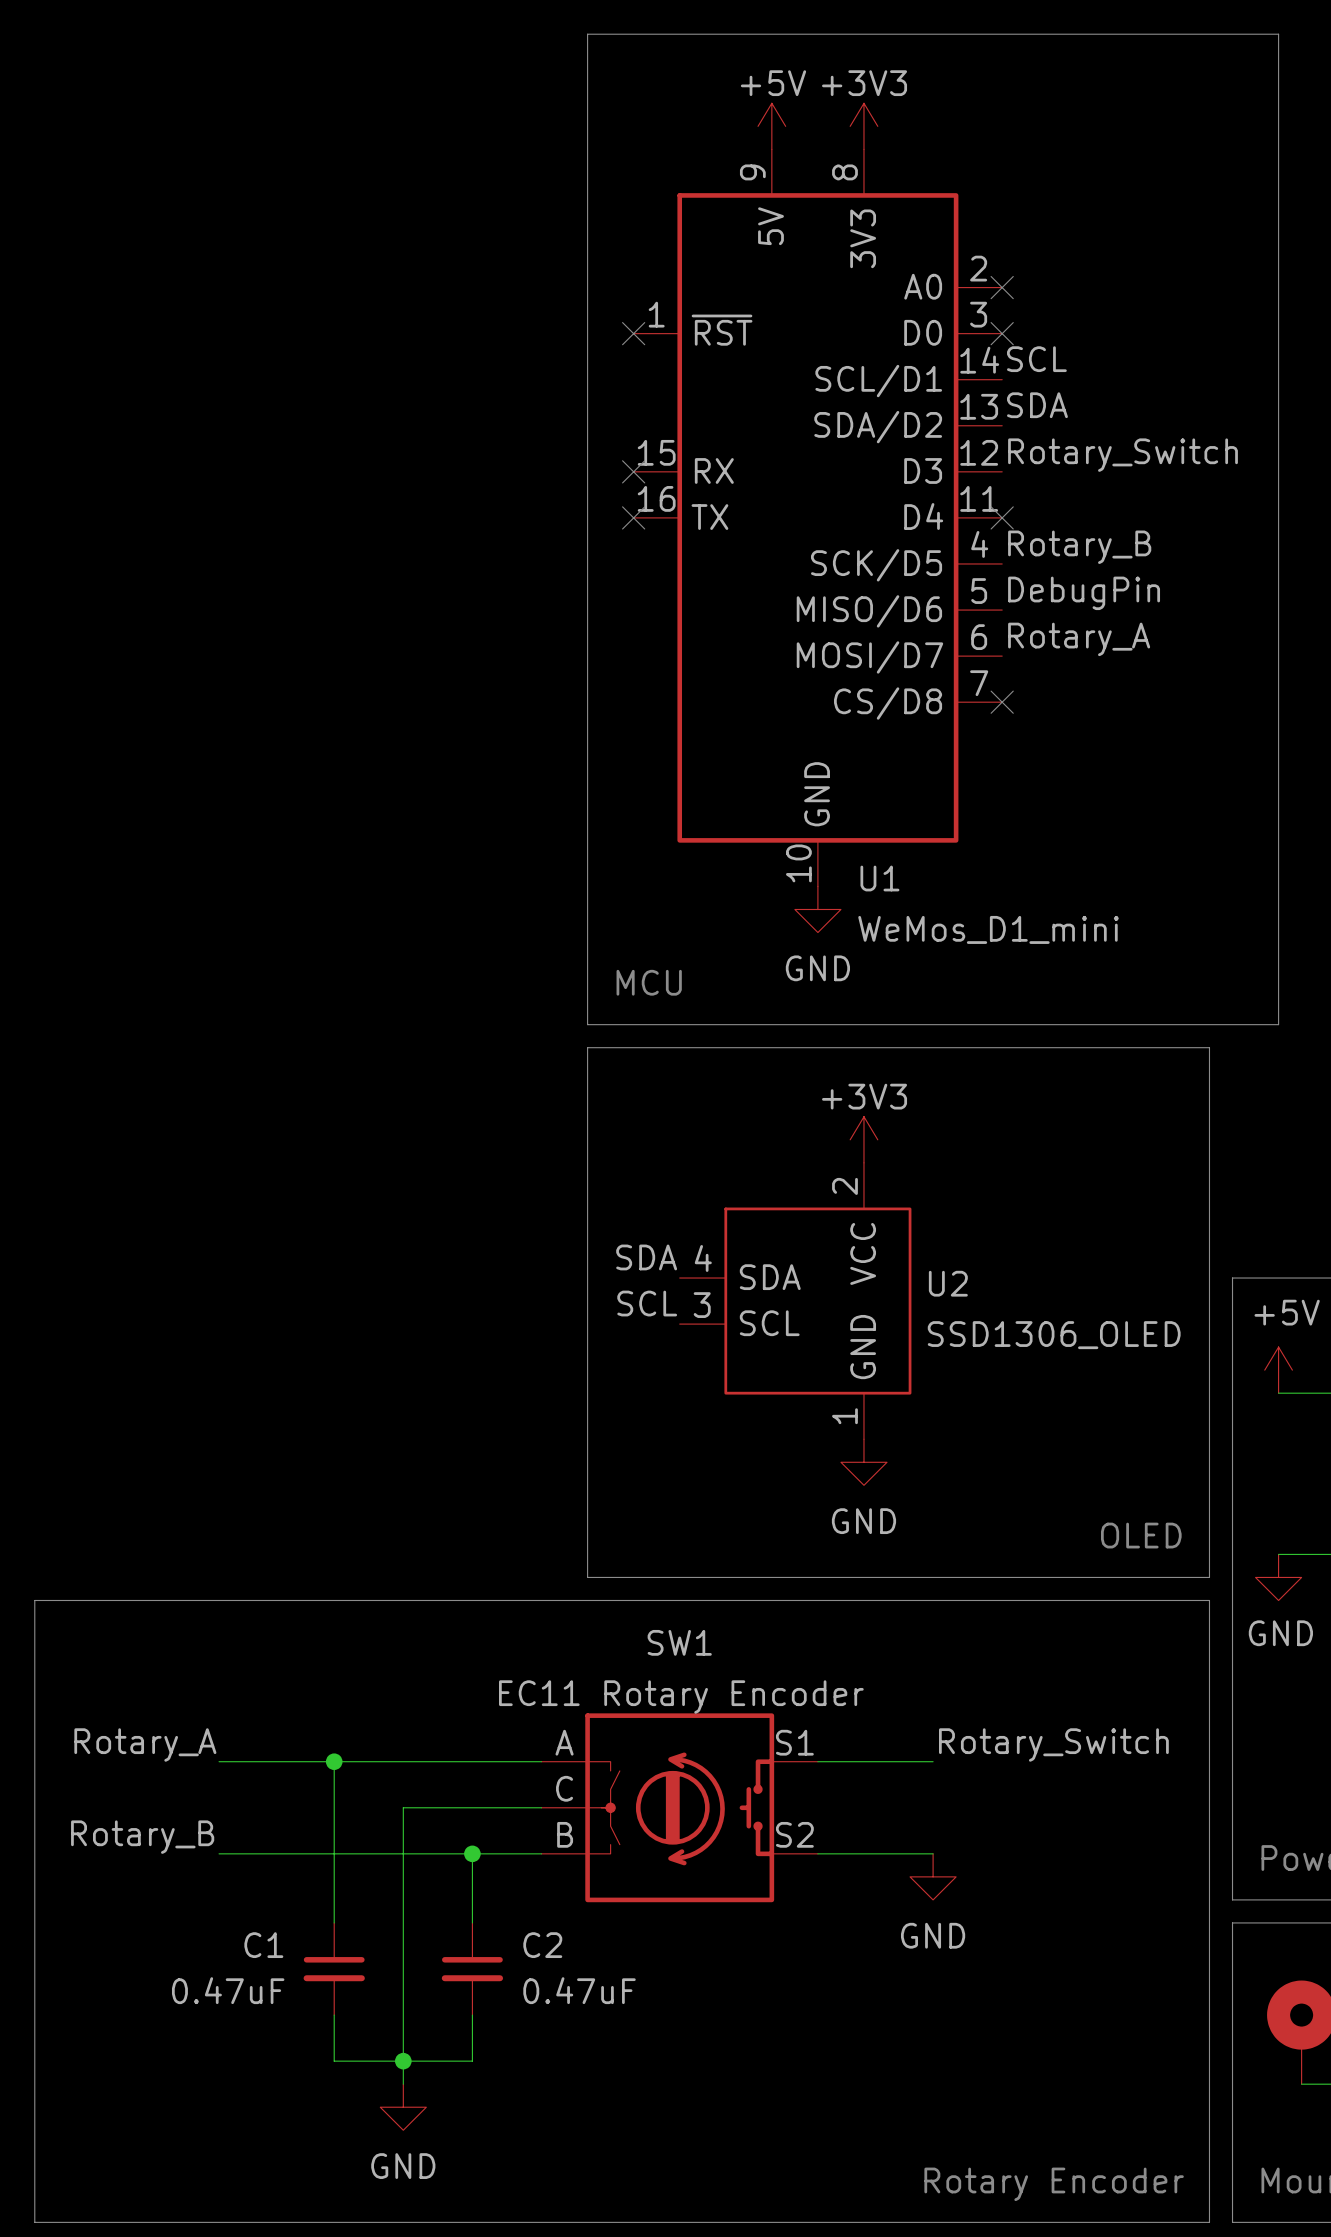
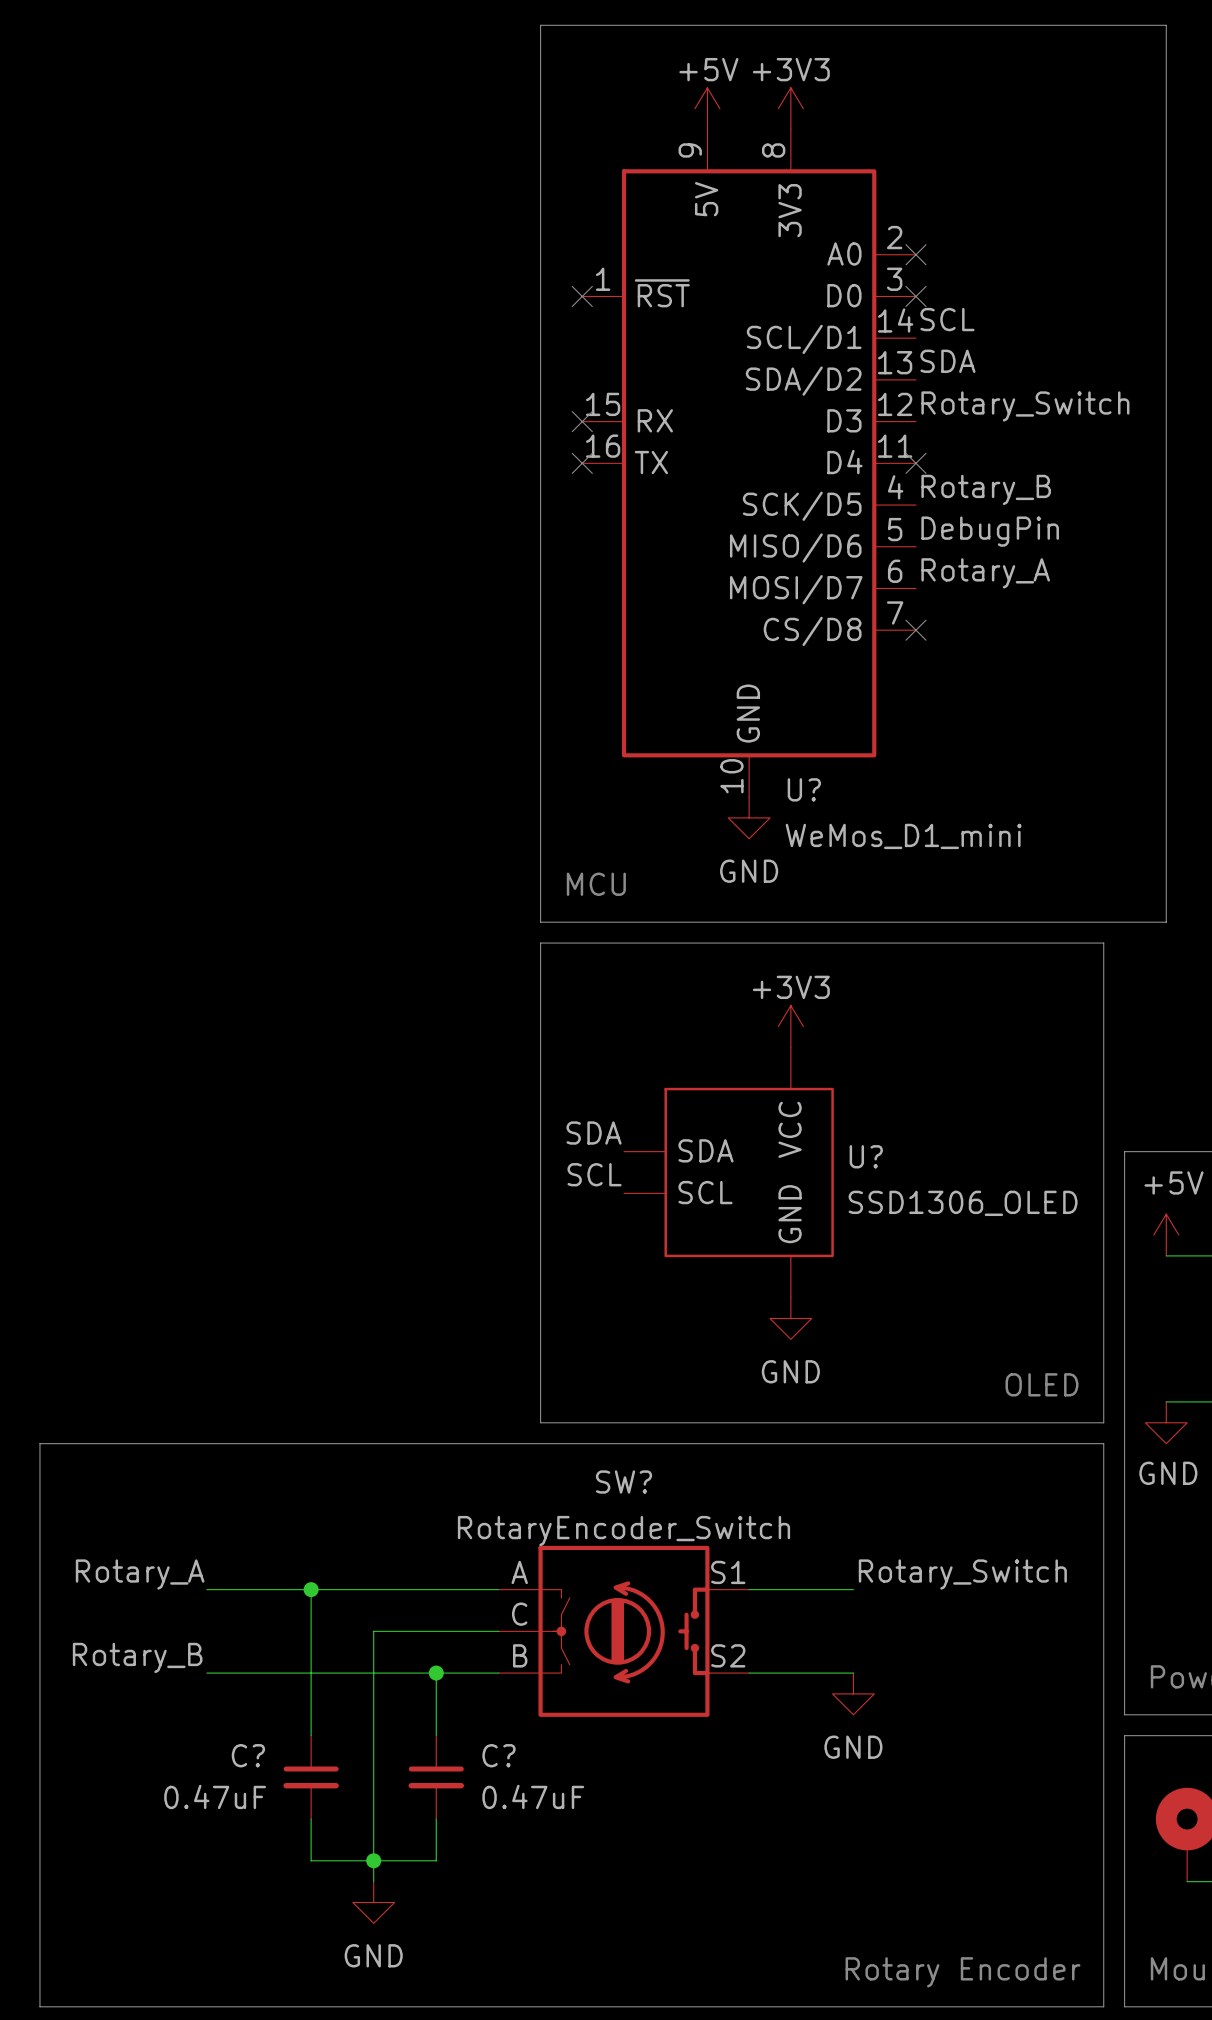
U1 name: U1 (879, 878) -> U? (804, 789)
U2 pin number: 2 (844, 1186) -> none
U2 pin number: 4 (703, 1258) -> none
U2 name: U2 (948, 1283) -> U? (866, 1156)
U2 pin number: 3 (702, 1305) -> none
U2 pin number: 1 (844, 1416) -> none
SW1 name: SW1 (679, 1642) -> SW? (623, 1482)
SW1 value: EC11 Rotary Encoder (681, 1697) -> RotaryEncoder_Switch (623, 1531)
C1 name: C1 (263, 1945) -> C? (248, 1755)
C2 name: C2 (542, 1945) -> C? (499, 1755)

